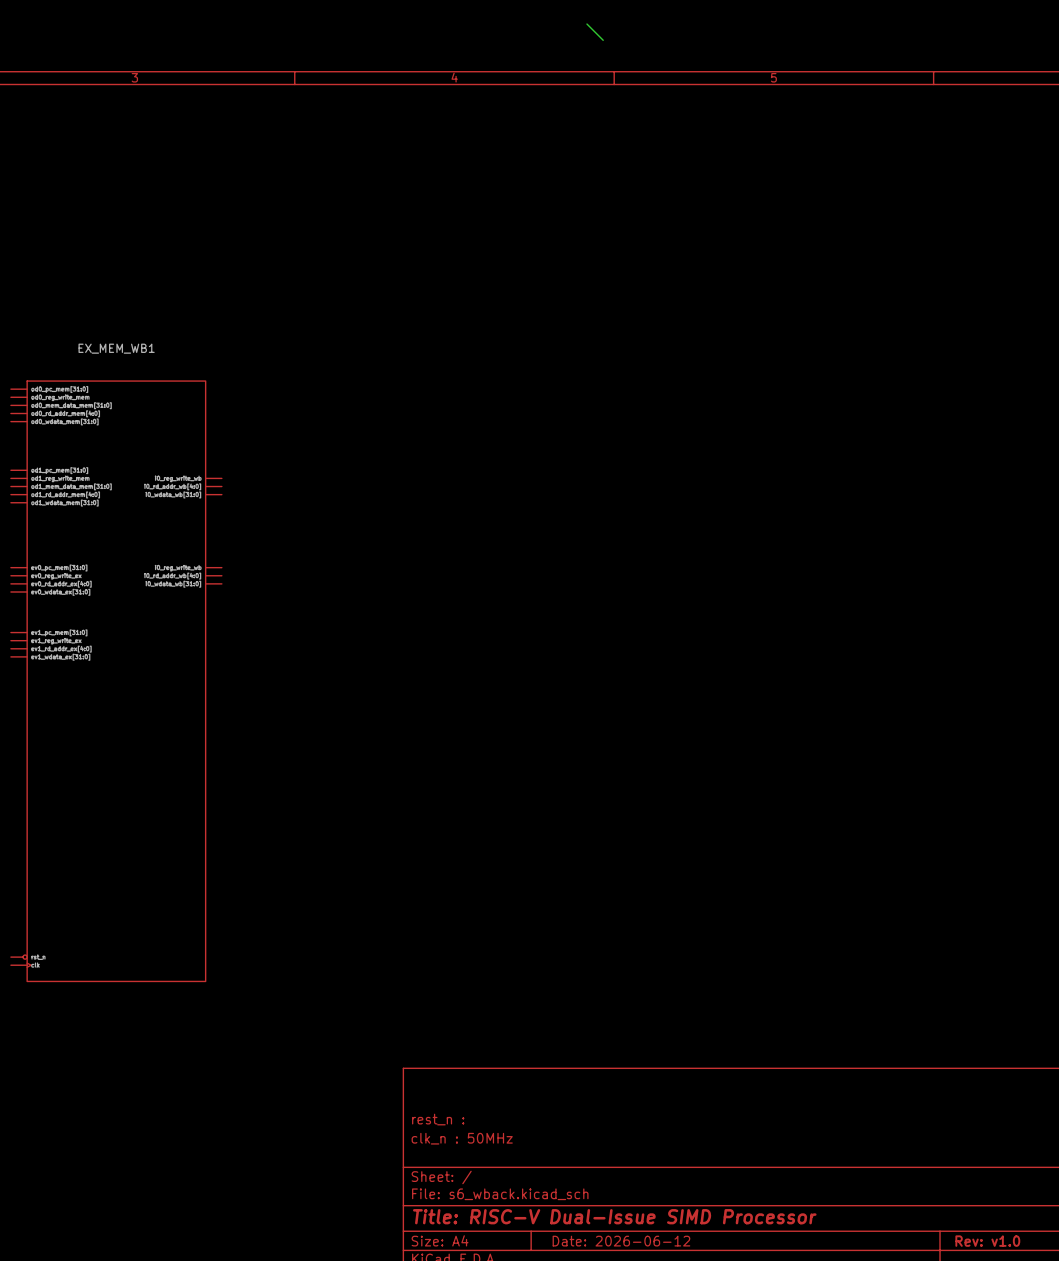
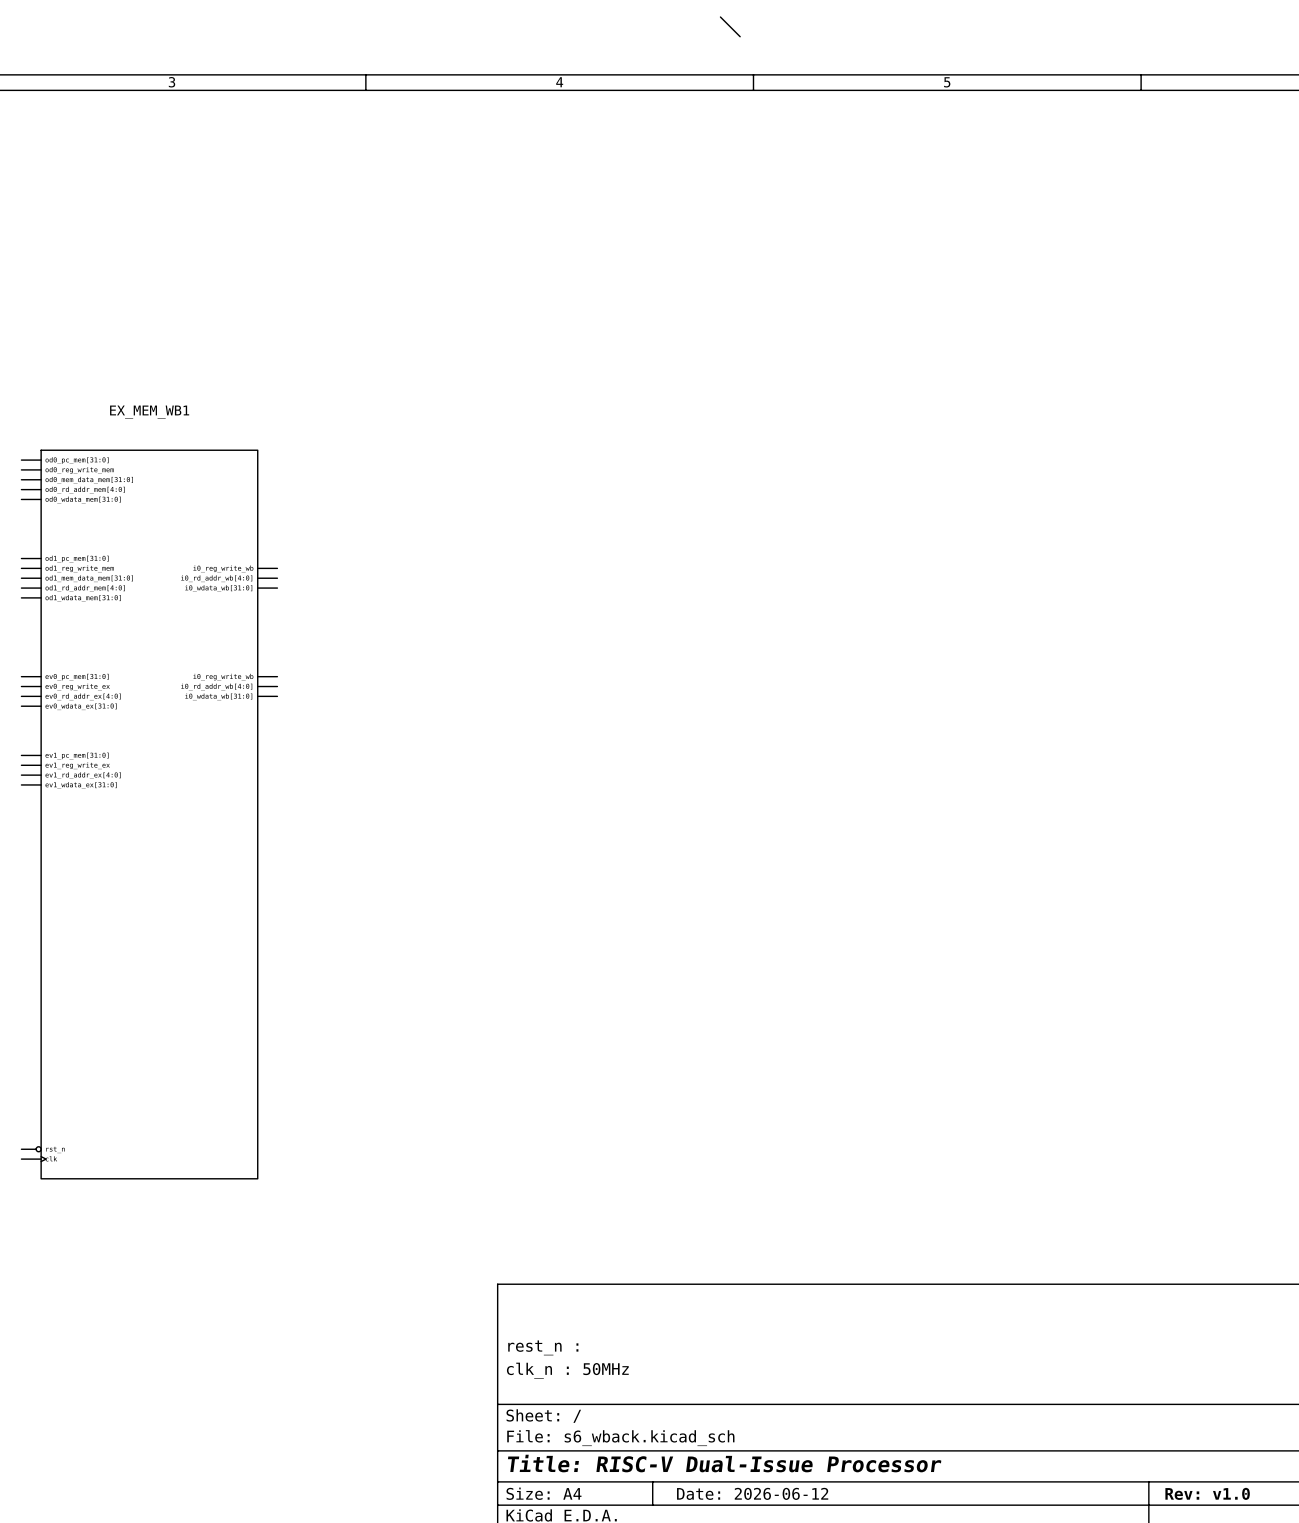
title block: Title: RISC-V Dual-Issue SIMD Processor (614, 1216) -> Title: RISC-V Dual-Issue Processor (724, 1463)

